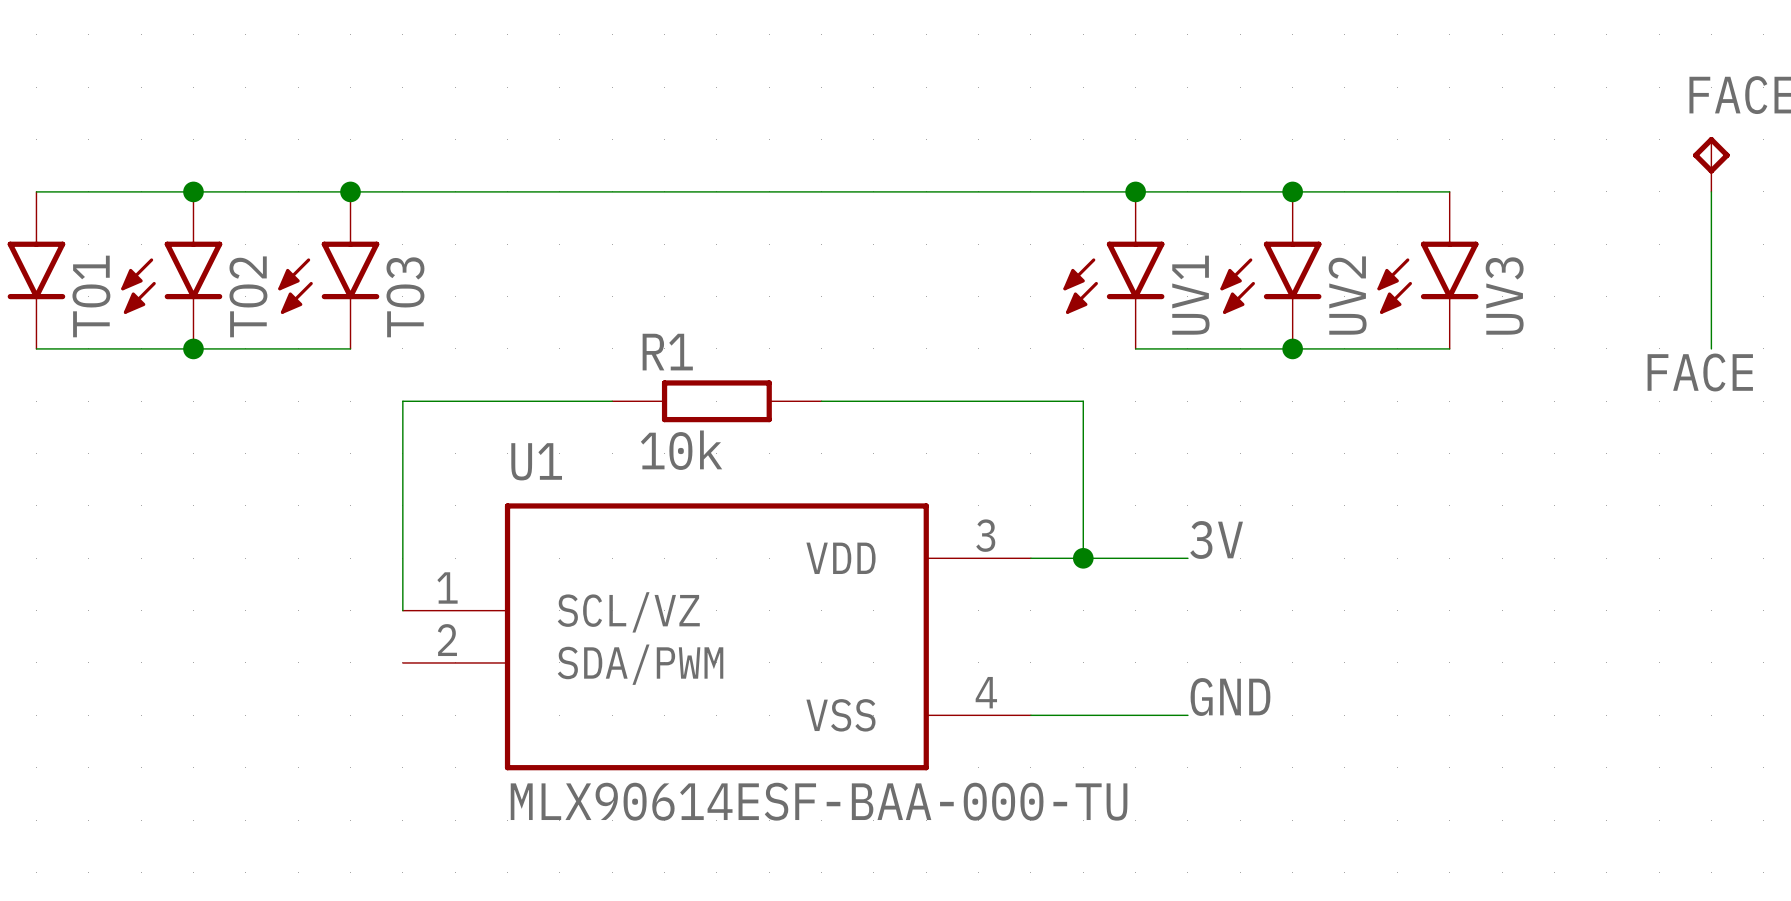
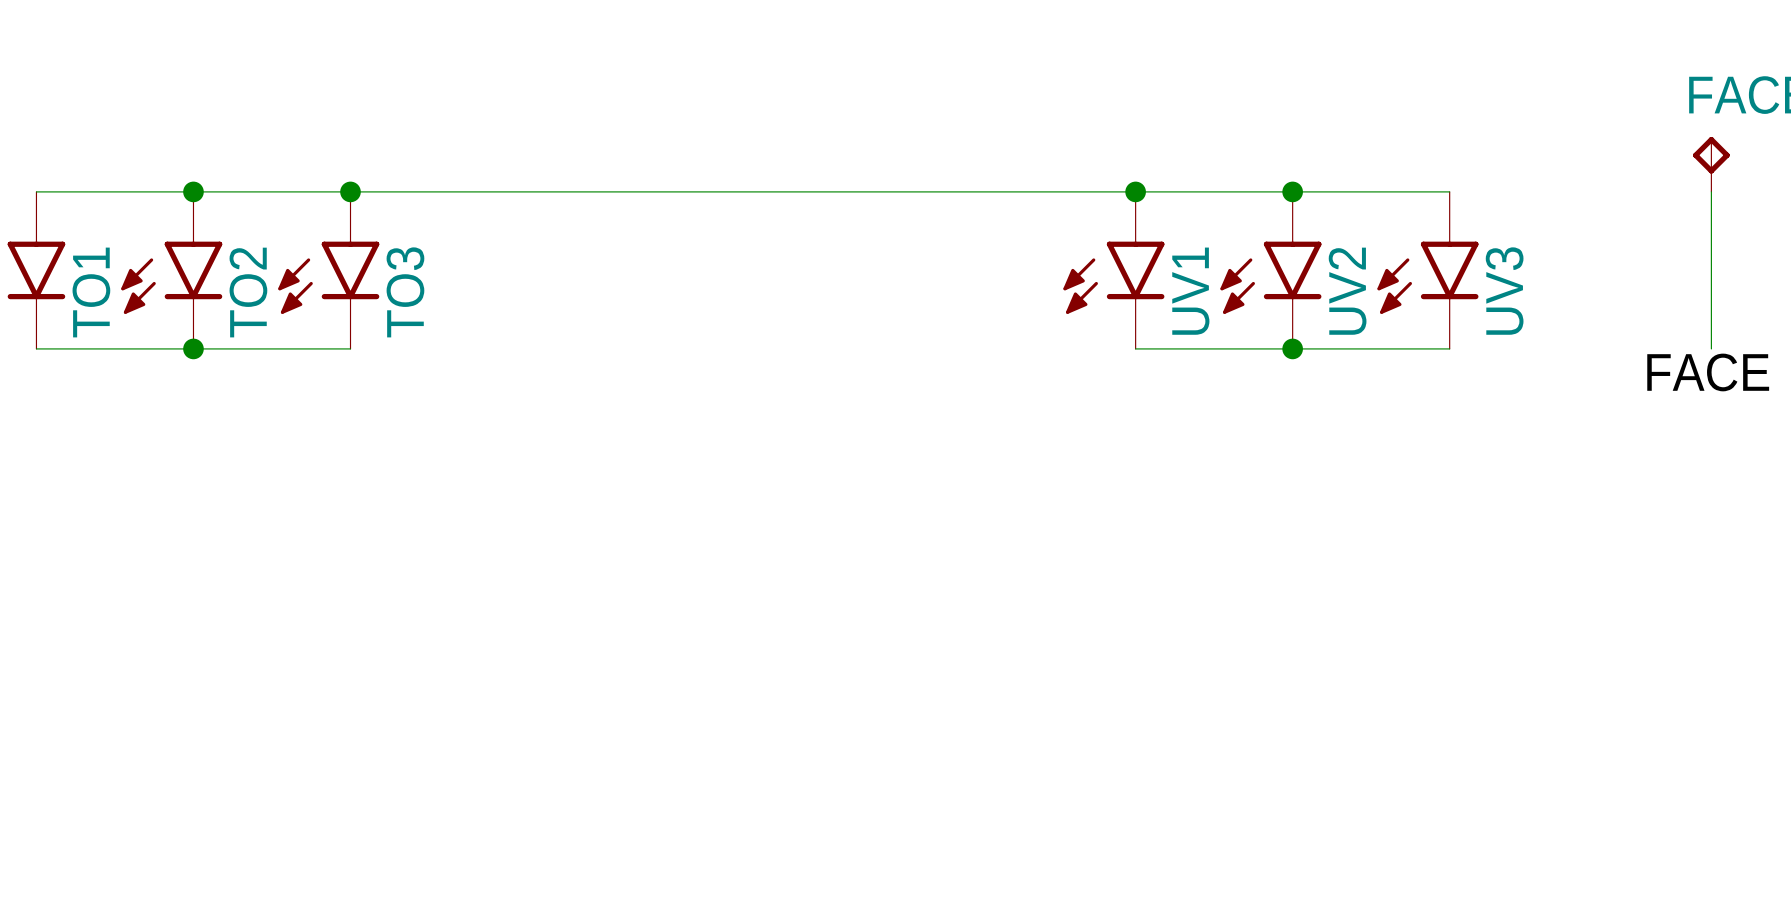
wire: (612, 401) (402, 401) (402, 610) -> none
R1: 10k (716, 401) -> none
wire: (821, 401) (1083, 401) (1083, 558) -> none
label: 3V (1216, 539) -> none
wire: (1030, 558) (1187, 558) -> none
junction: (1083, 558) -> none
U1: MLX90614ESF-BAA-000-TU (716, 636) -> none
label: GND (1230, 697) -> none
wire: (1030, 715) (1187, 715) -> none

